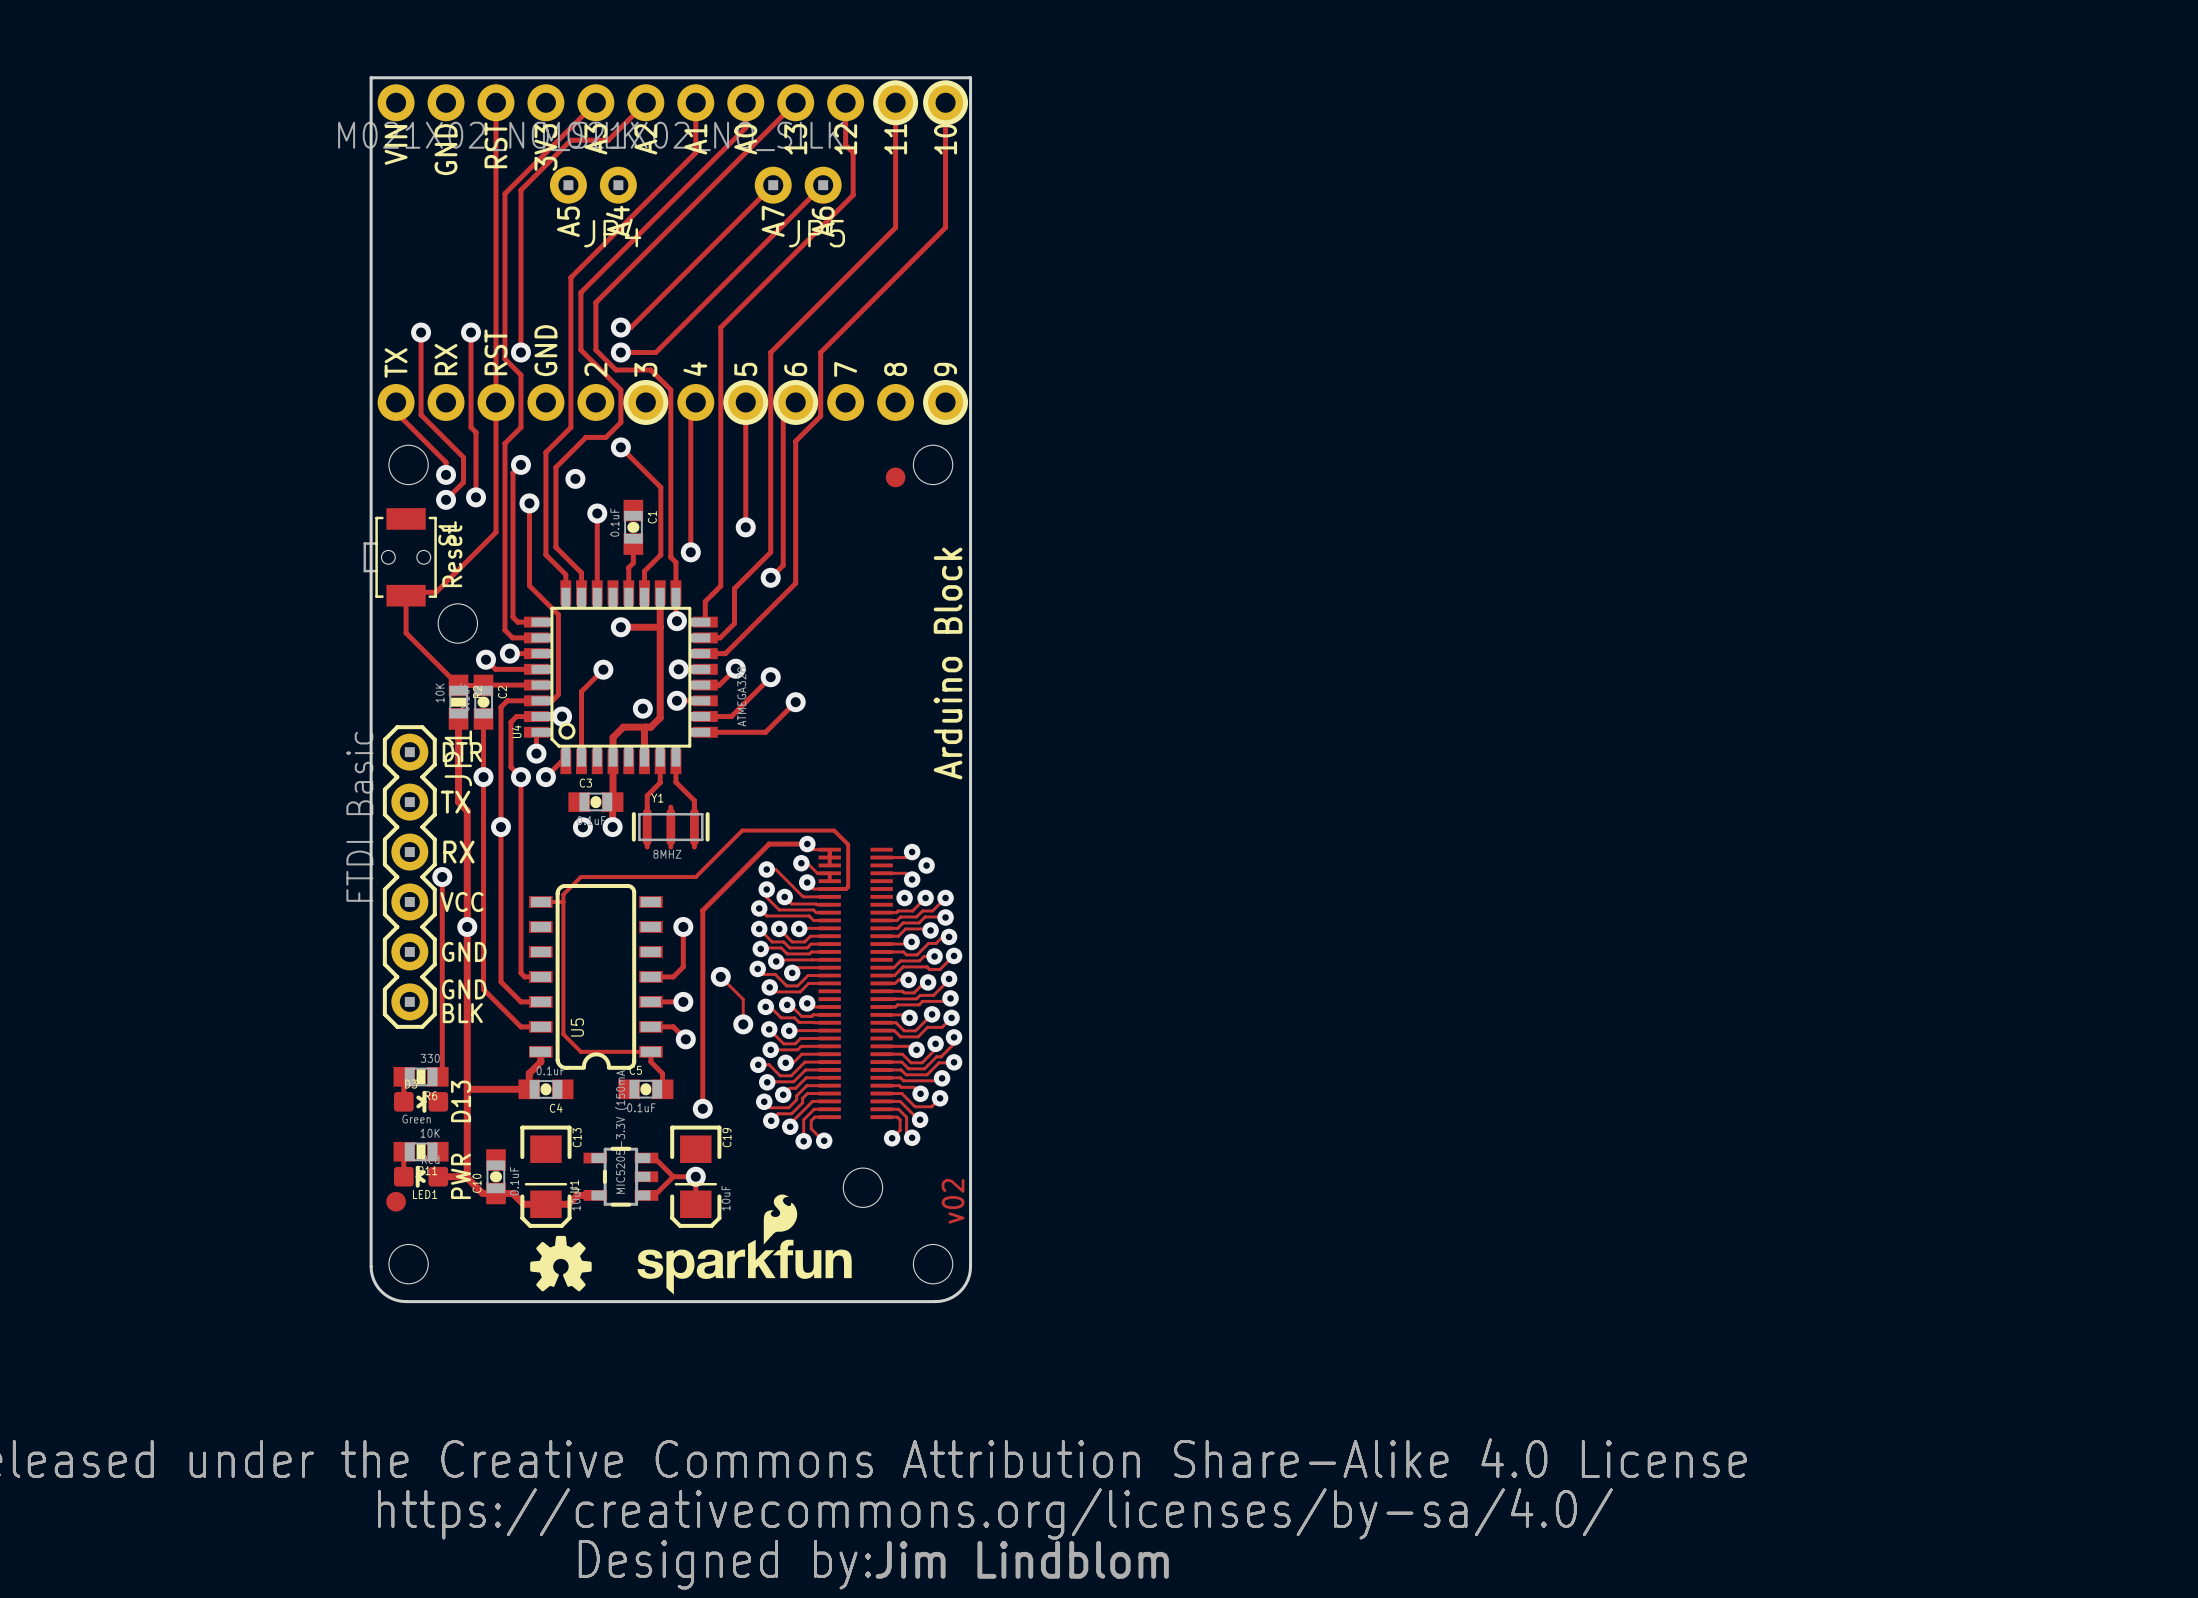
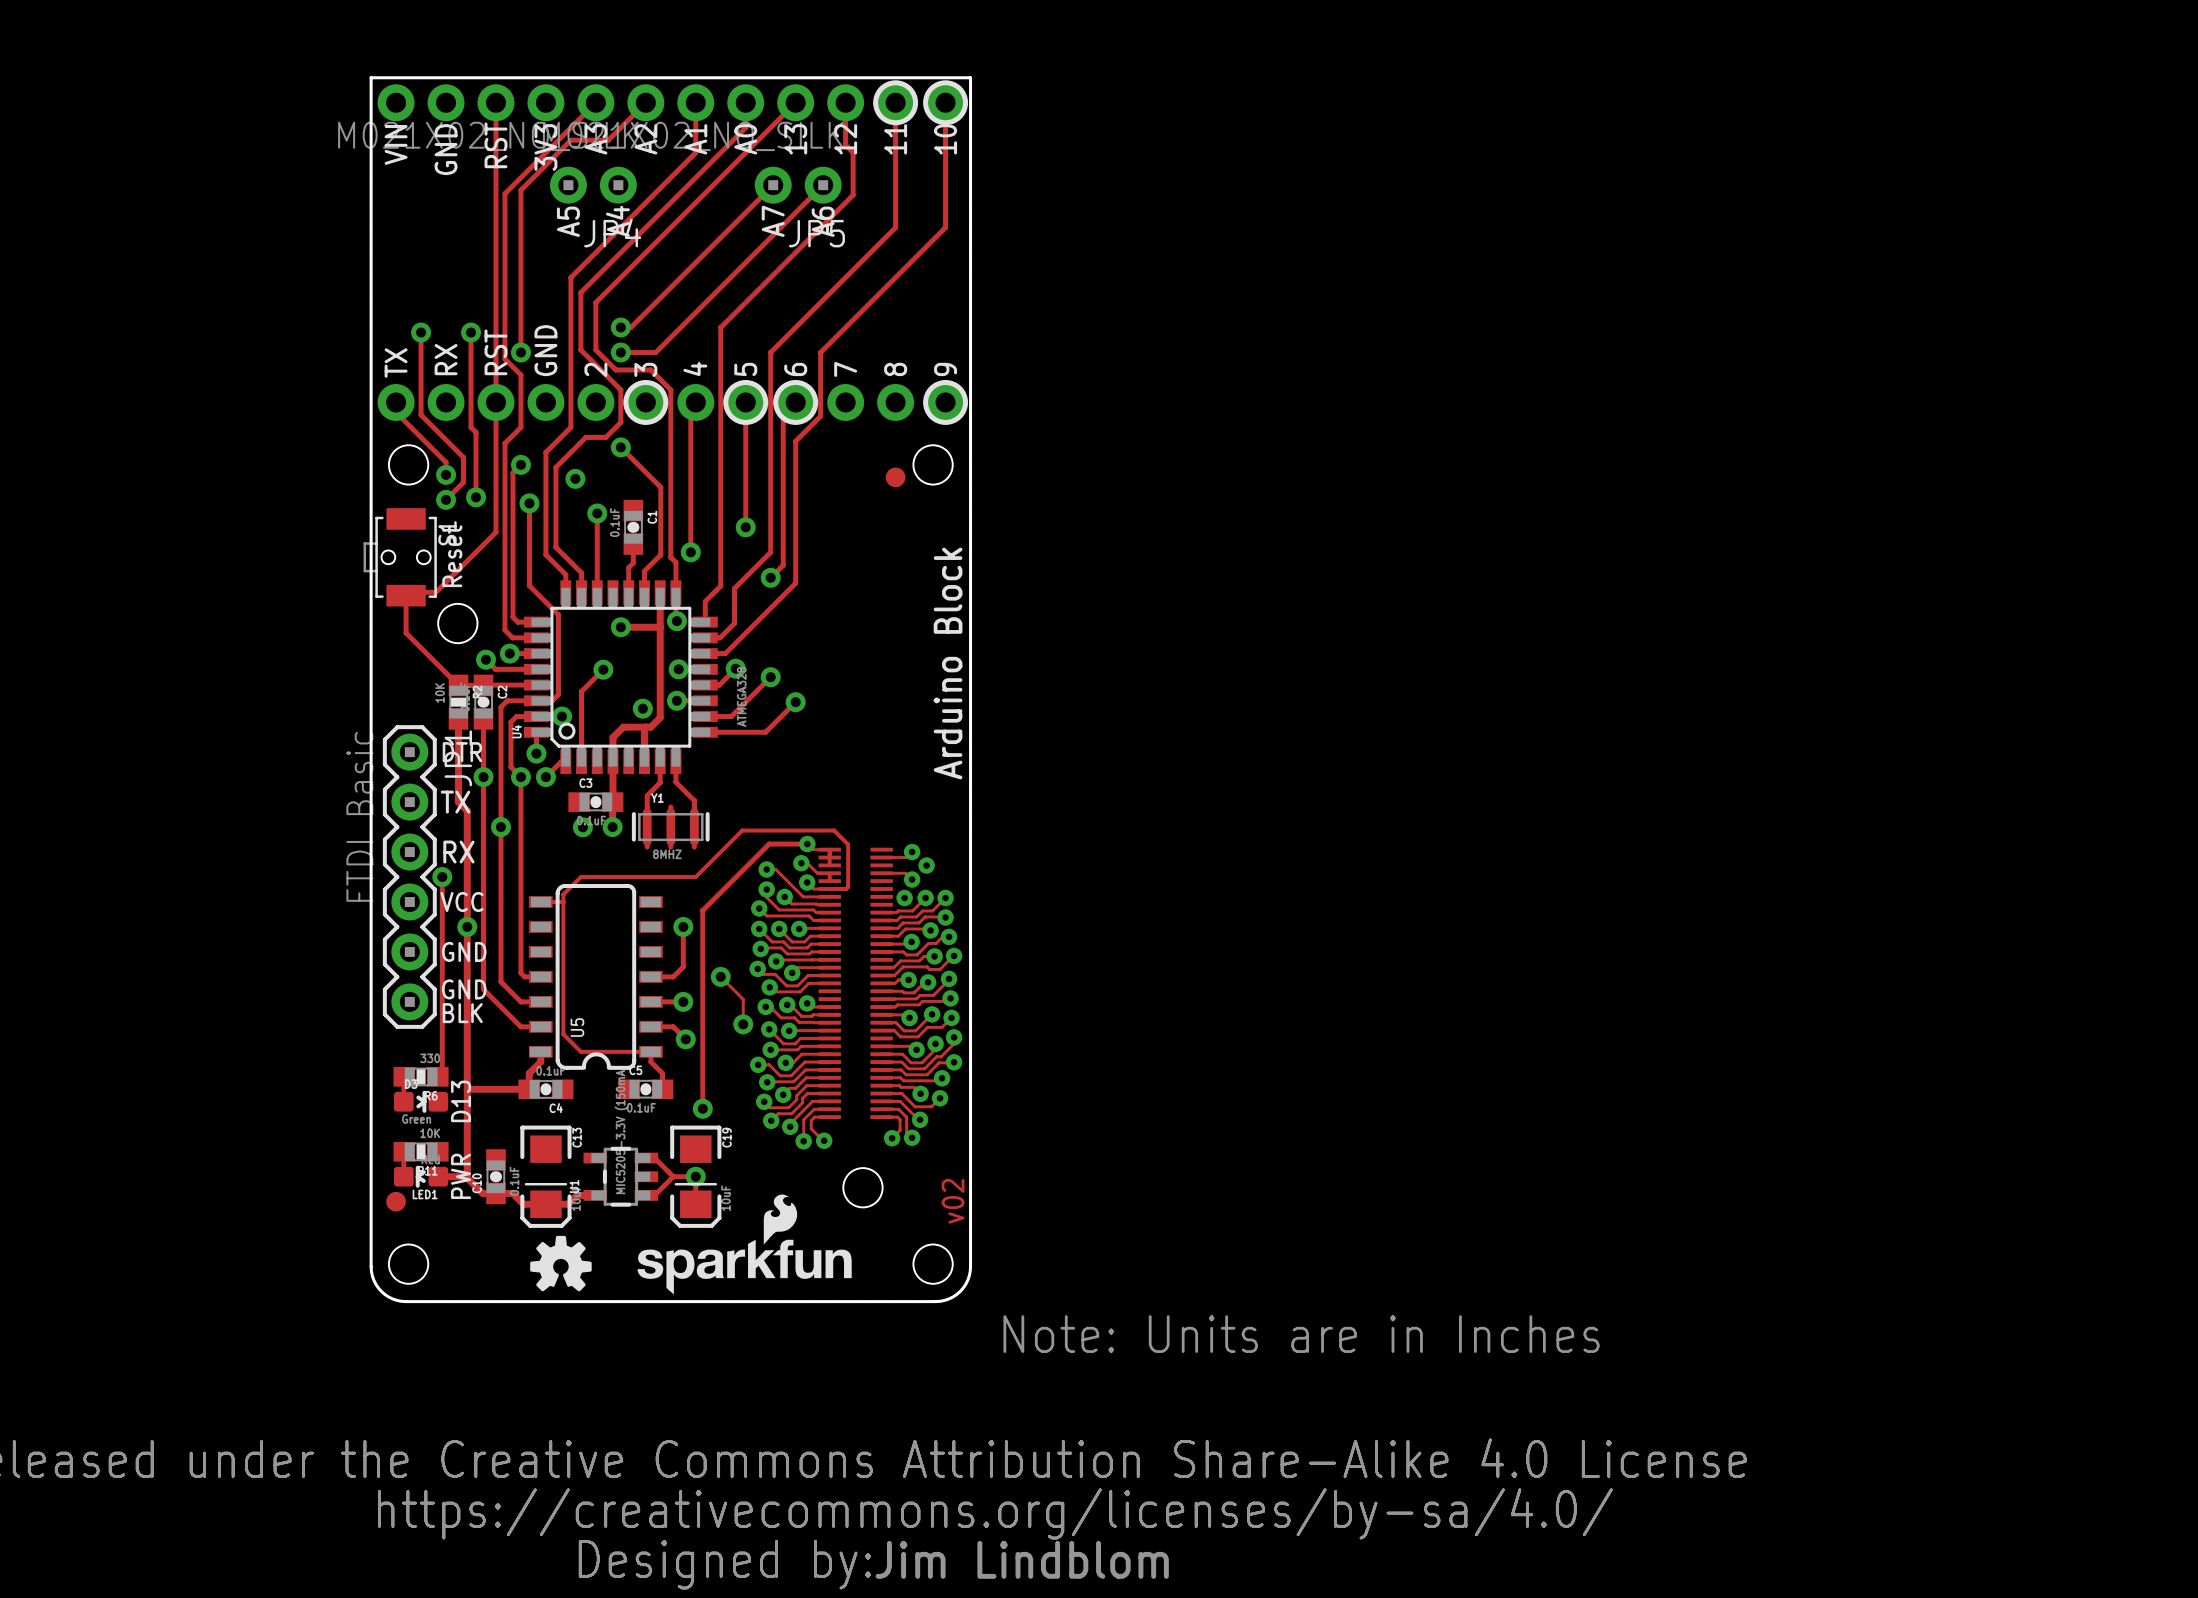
text: none -> Note: Units are in Inches (1301, 1334)

